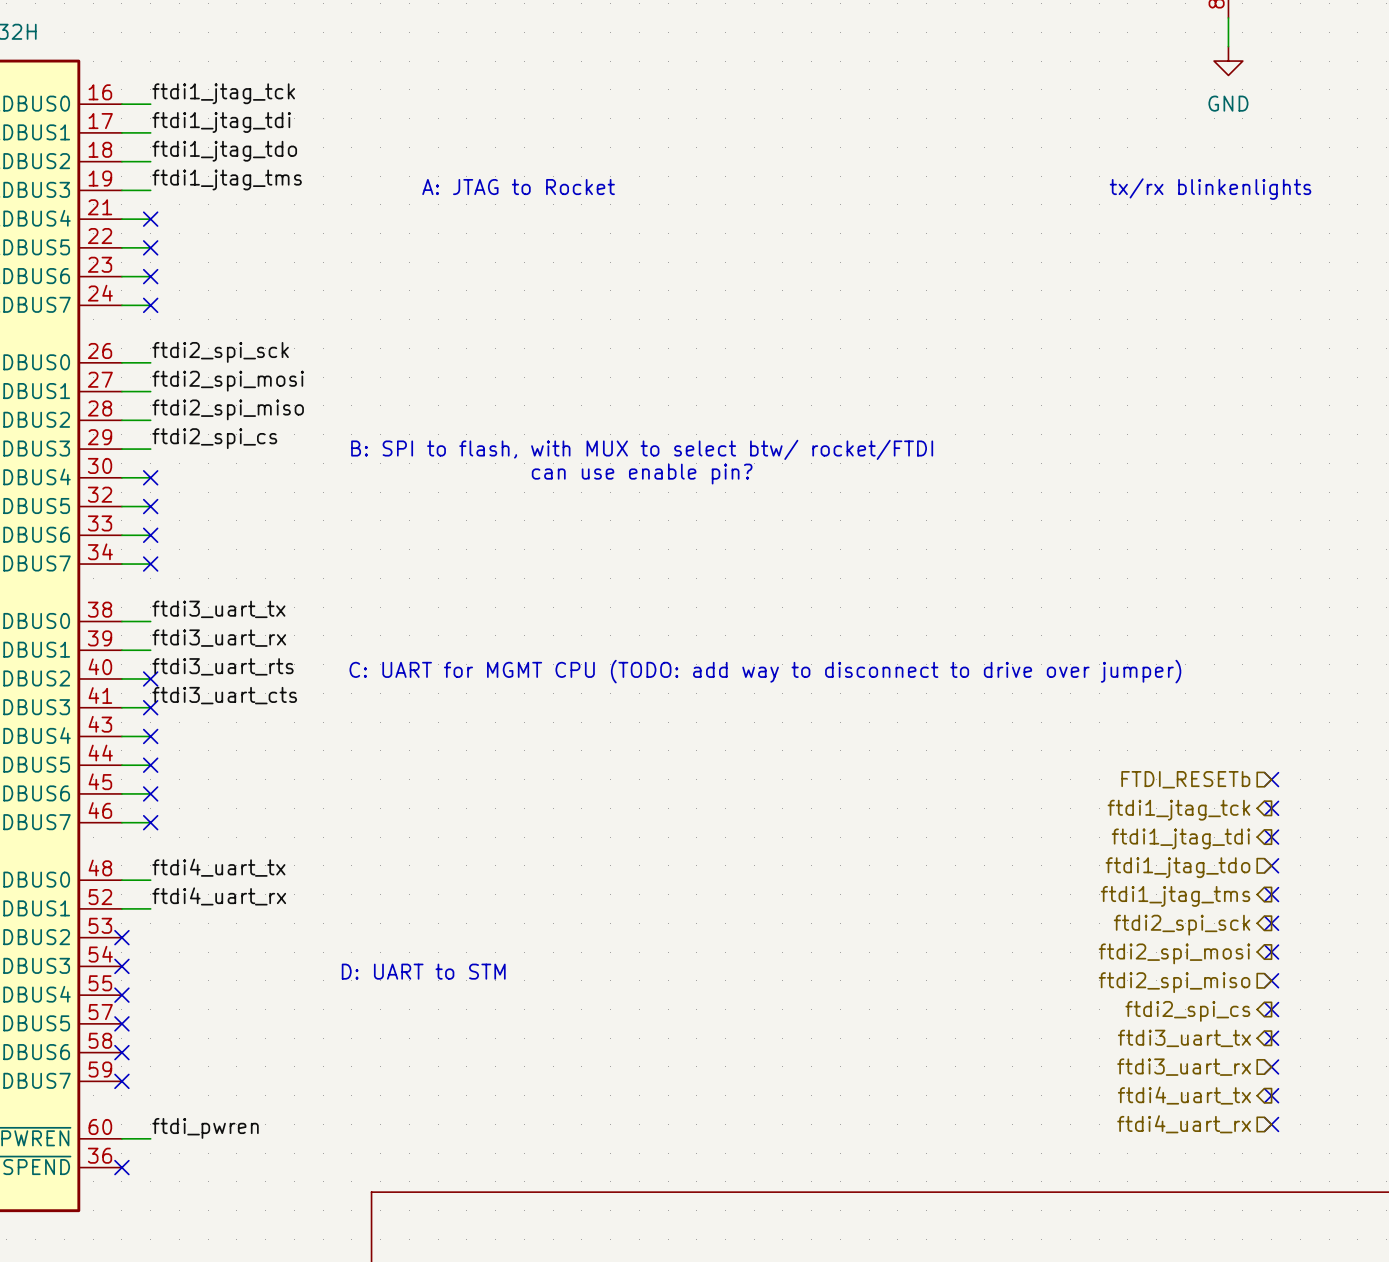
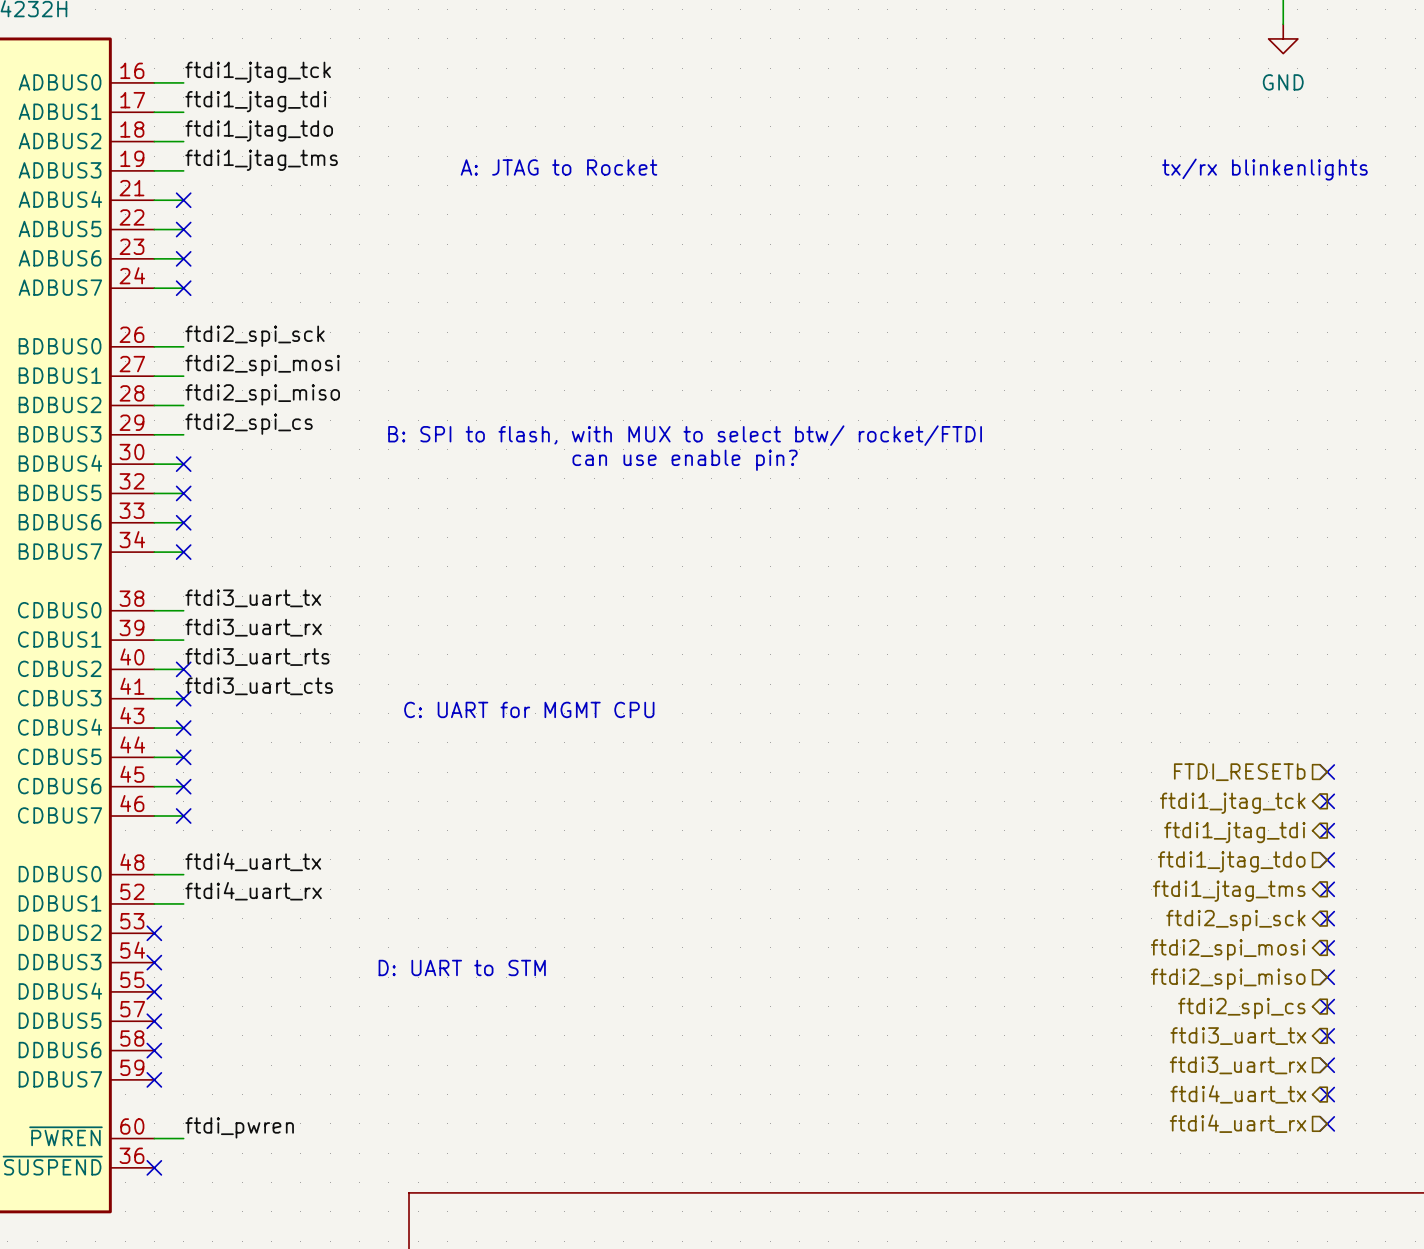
text: C: UART for MGMT CPU (TODO: add way to disconnect to drive over jumper) (765, 671) -> none
text: none -> C: UART for MGMT CPU (529, 709)

